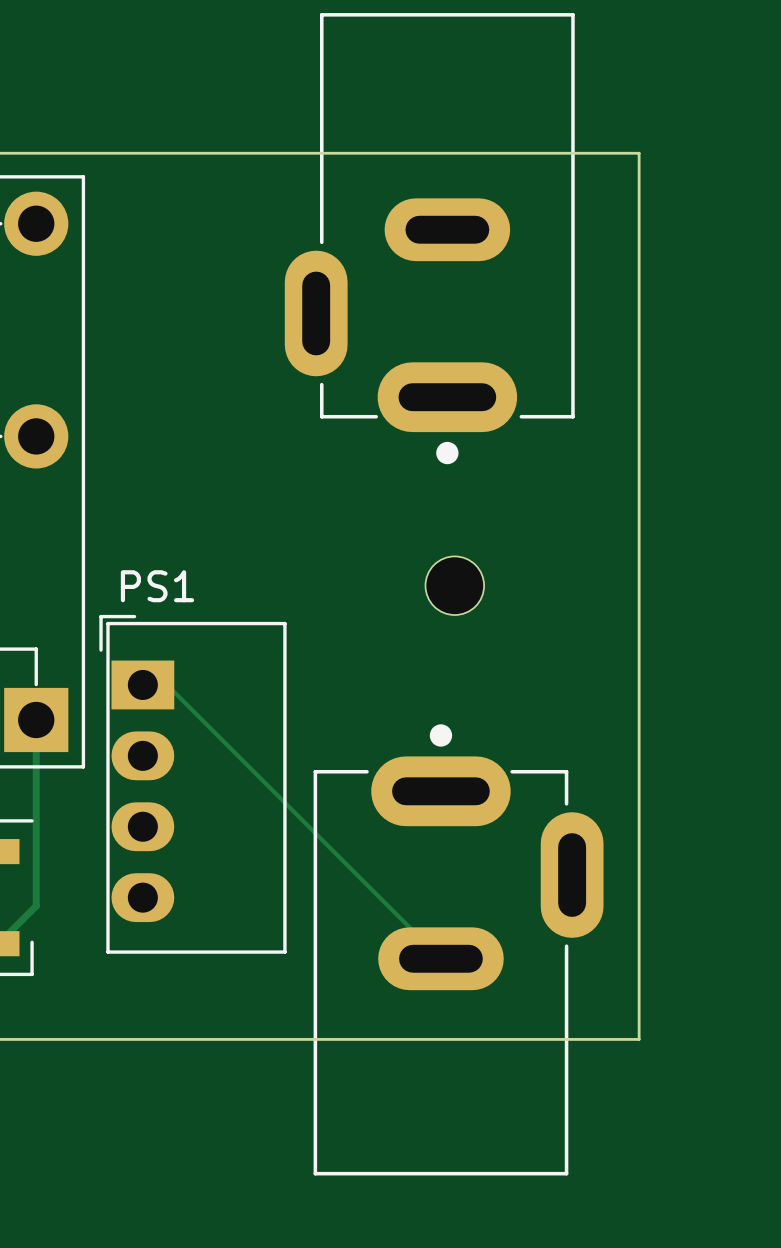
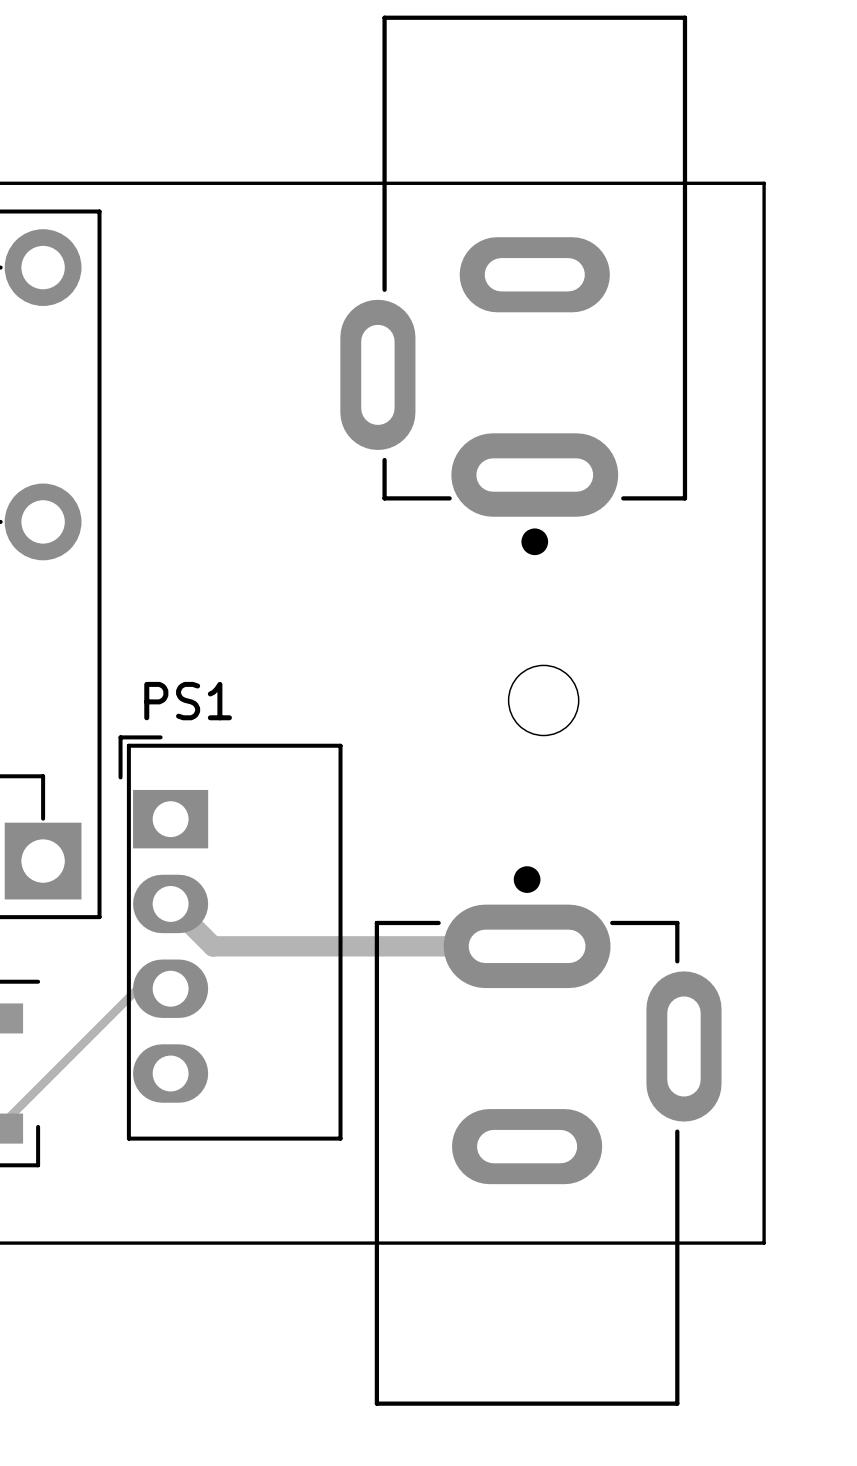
track: (142, 684) (167, 684) (440, 958) -> none
track: (36, 719) (36, 906) -> (170, 988) (137, 988) (43, 1083)
track: none -> (170, 903) (213, 946) (527, 946)

